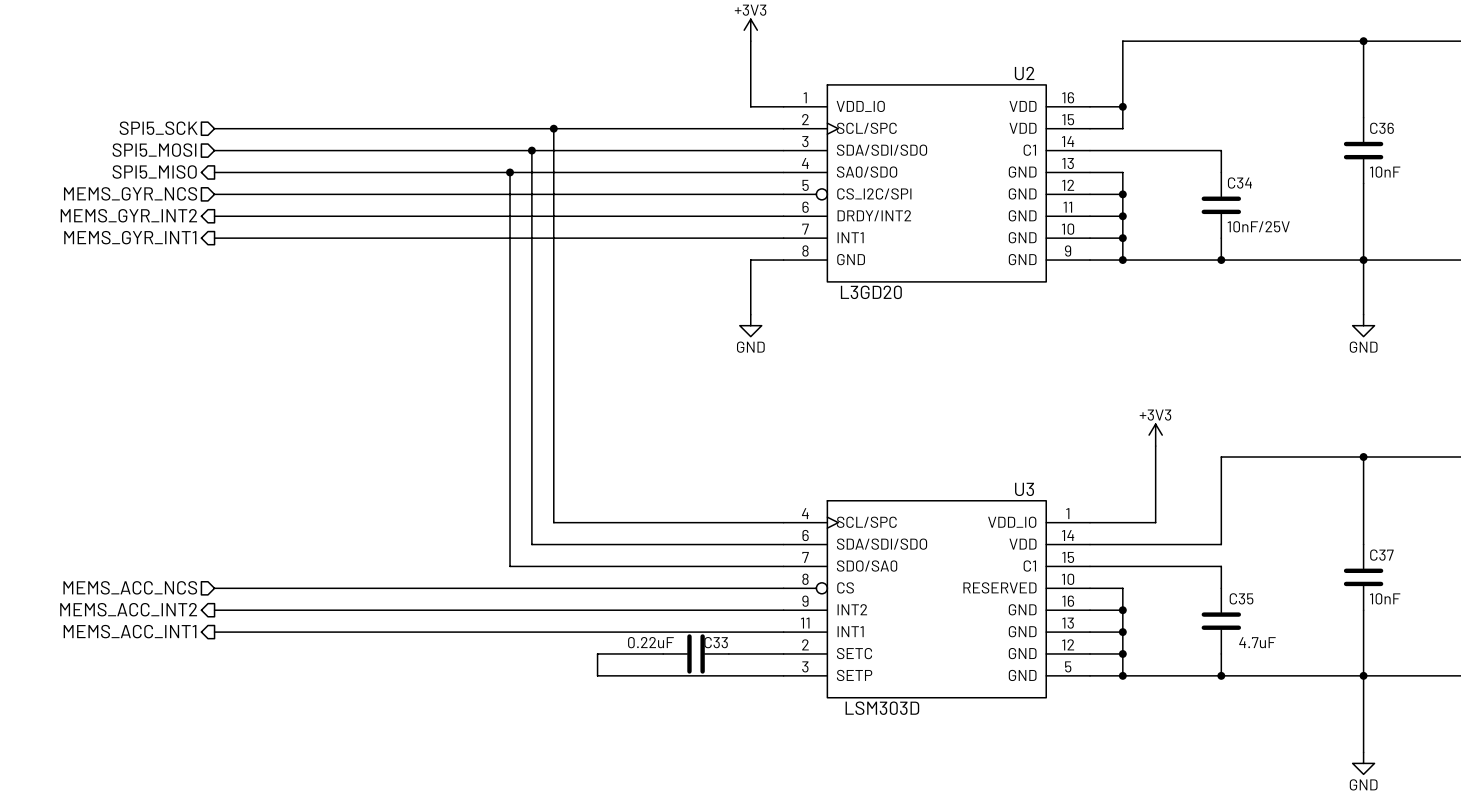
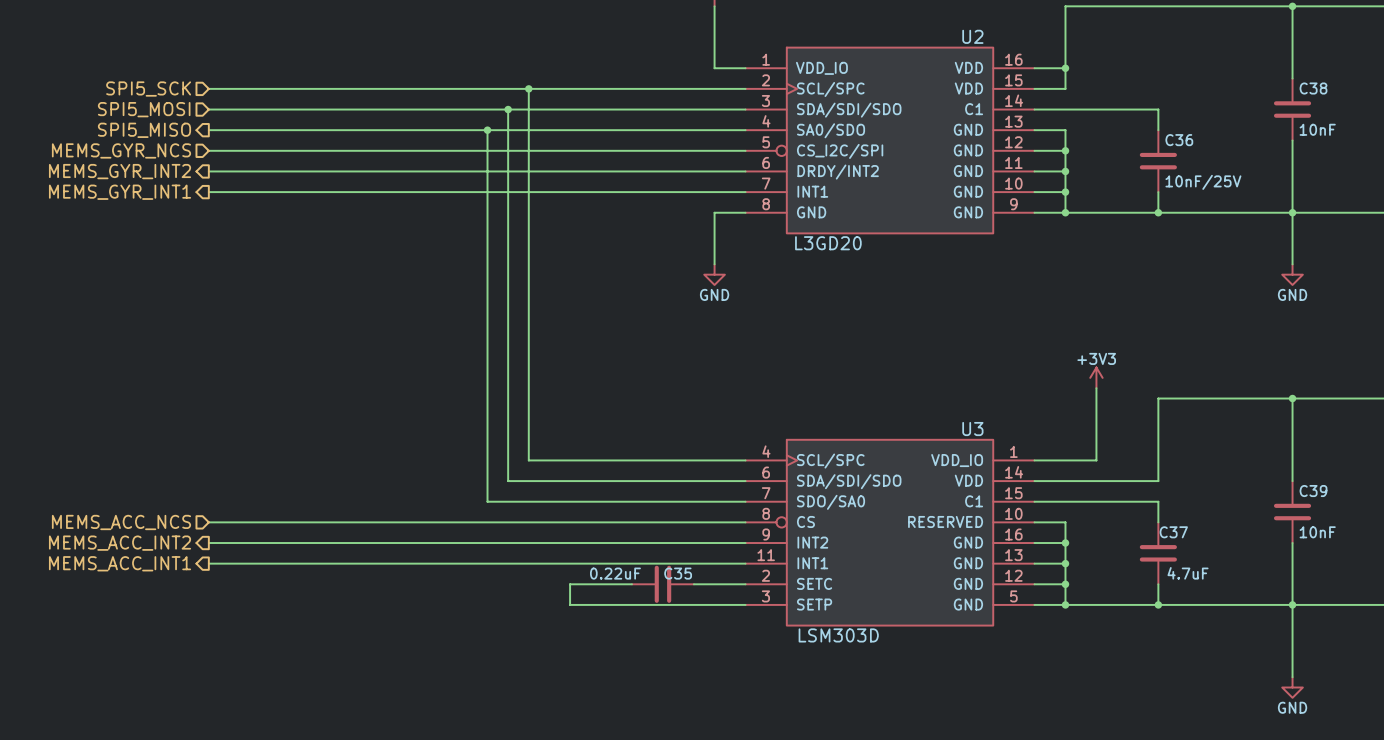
C36 name: C36 (1382, 128) -> C38 (1313, 88)
C34 name: C34 (1239, 183) -> C36 (1179, 140)
C37 name: C37 (1381, 555) -> C39 (1313, 491)
C35 name: C35 (1241, 598) -> C37 (1173, 532)
C33 name: C33 (716, 642) -> C35 (678, 573)

